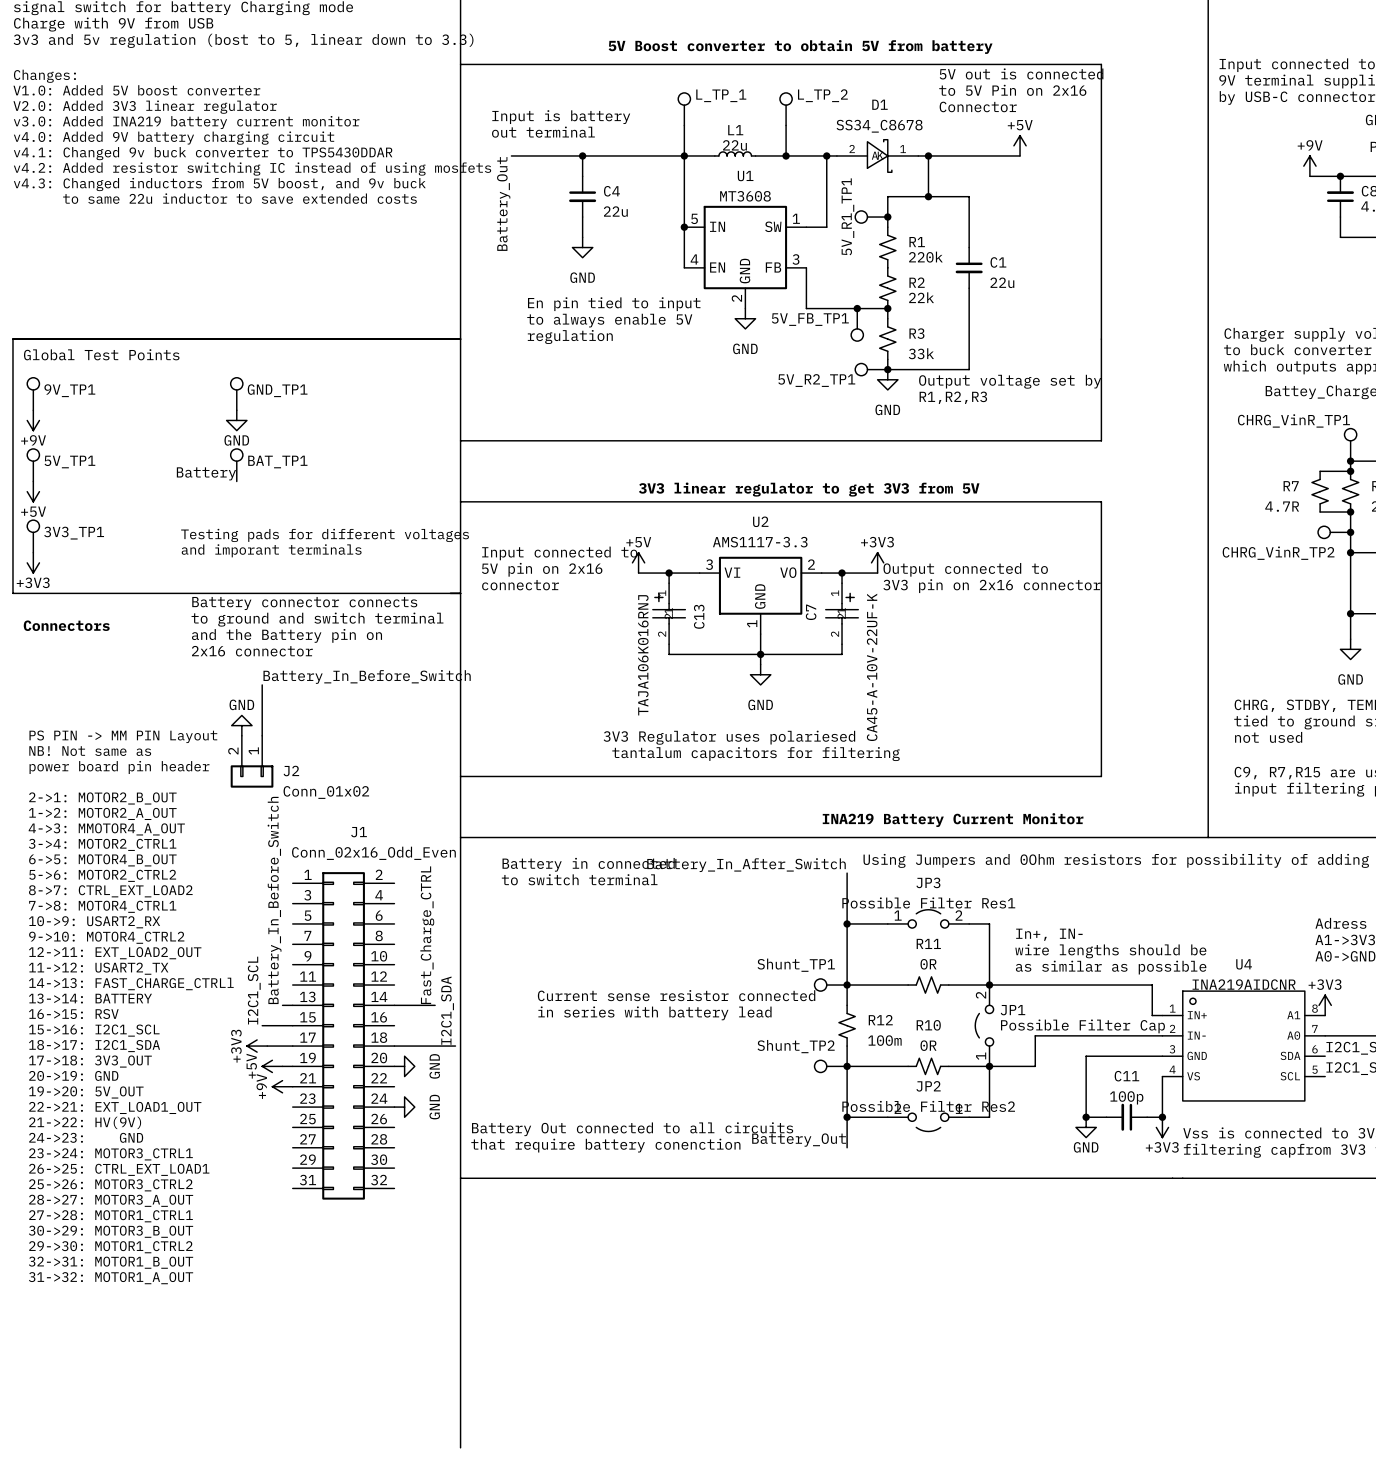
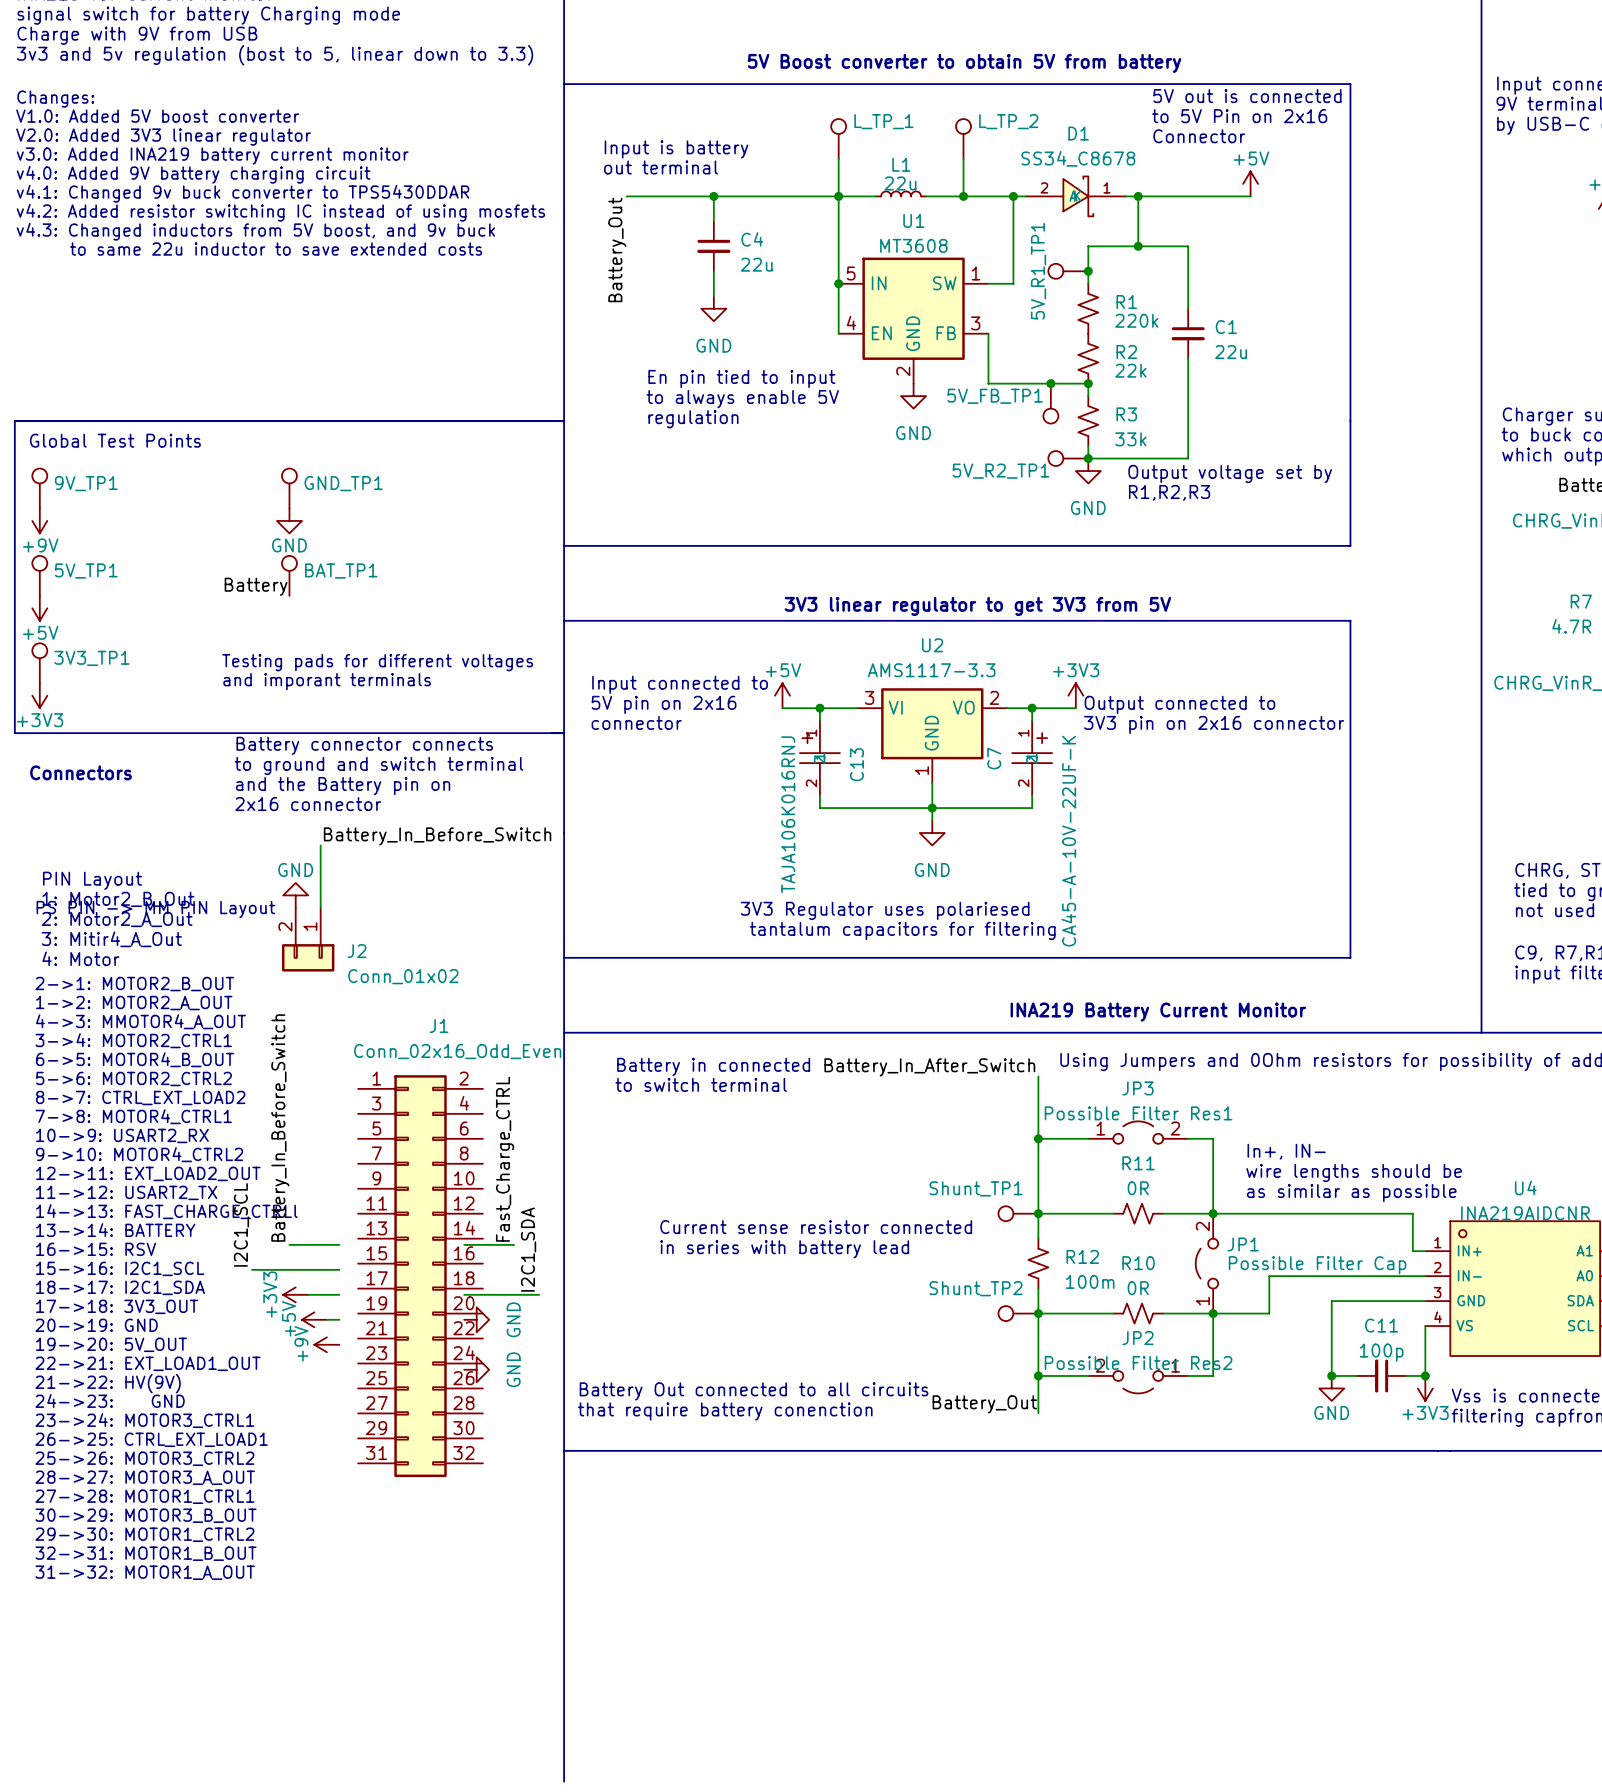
text: none -> PIN Layout (92, 880)
text: none -> 1: Motor2_B_Out (118, 899)
text: none -> 2: Motor2_A_Out (117, 919)
text: NB! Not same as (90, 751) -> none
text: none -> 3: Mitir4_A_Out (111, 939)
text: power board pin header (119, 767) -> none
text: none -> 4: Motor (80, 958)
label position: Battery_In_Before_Switch (274, 900) -> Battery_In_Before_Switch (280, 1128)
label position: Fast_Charge_CTRL (427, 935) -> Fast_Charge_CTRL (505, 1159)
label position: I2C1_SCL (254, 990) -> I2C1_SCL (241, 1224)
wire: (282, 1005) (292, 1005) -> none
wire: (394, 1005) (435, 1005) -> (464, 1244) (514, 1244)
wire: none -> (289, 1244) (339, 1244)
label position: I2C1_SDA (447, 1010) -> I2C1_SDA (528, 1249)
wire: (262, 1025) (292, 1025) -> none
wire: none -> (252, 1269) (339, 1269)
power symbol position: +3V3 (257, 1046) -> +3V3 (295, 1294)
wire: (267, 1046) (292, 1046) -> (308, 1294) (339, 1294)
wire: (394, 1046) (455, 1046) -> (464, 1294) (539, 1294)
power symbol position: +5V (272, 1066) -> +5V (314, 1319)
wire: (282, 1066) (292, 1066) -> (326, 1319) (339, 1319)
power symbol position: GND (404, 1066) -> GND (476, 1319)
power symbol position: +9V (282, 1086) -> +9V (326, 1344)
power symbol position: GND (404, 1107) -> GND (476, 1369)

